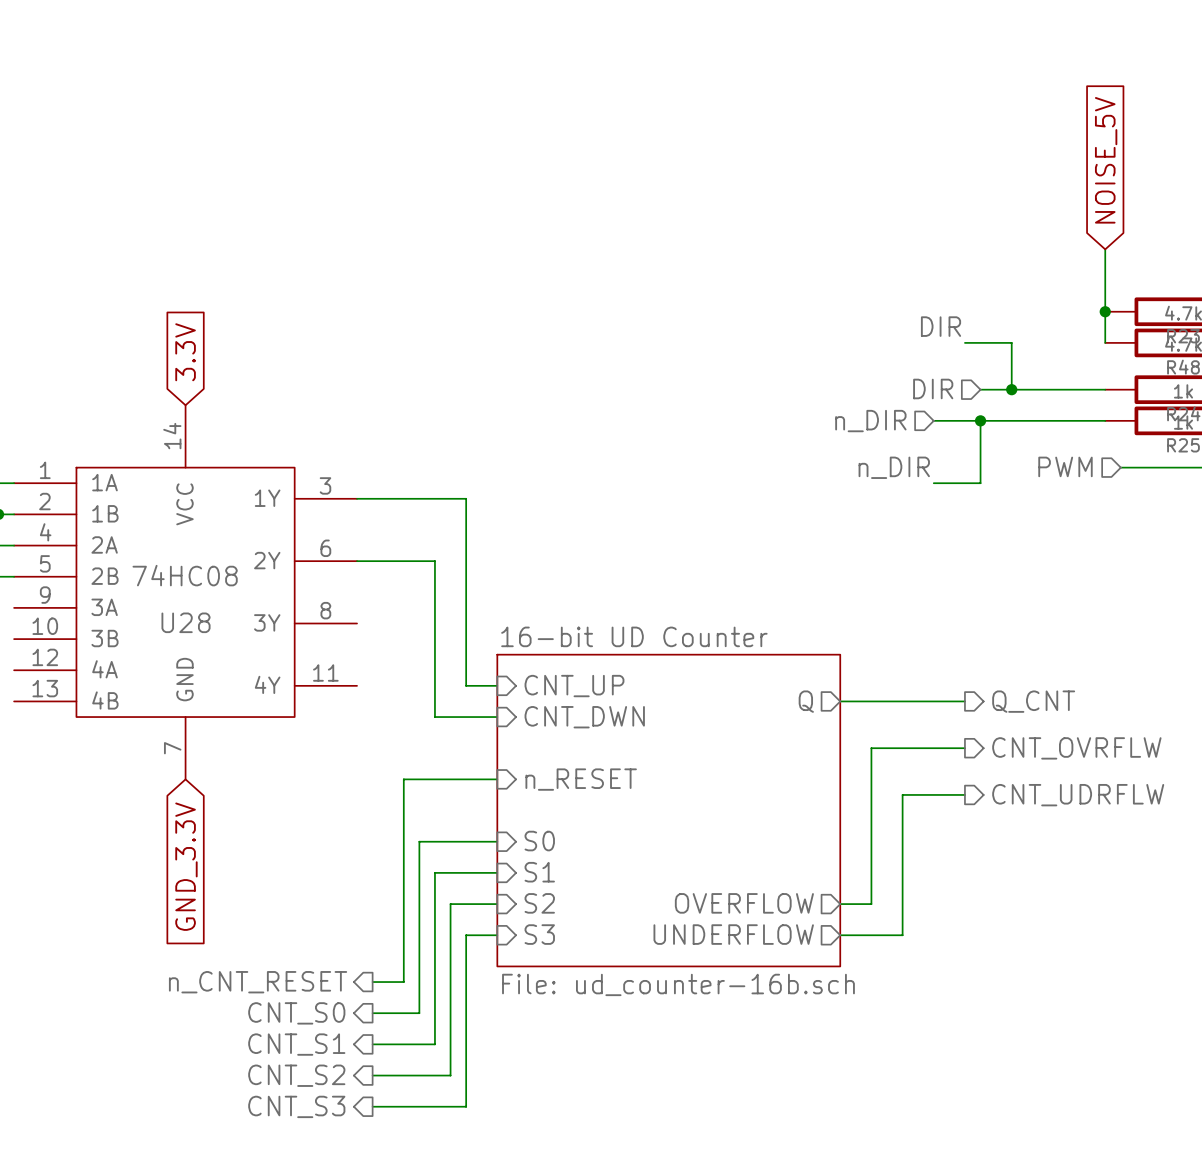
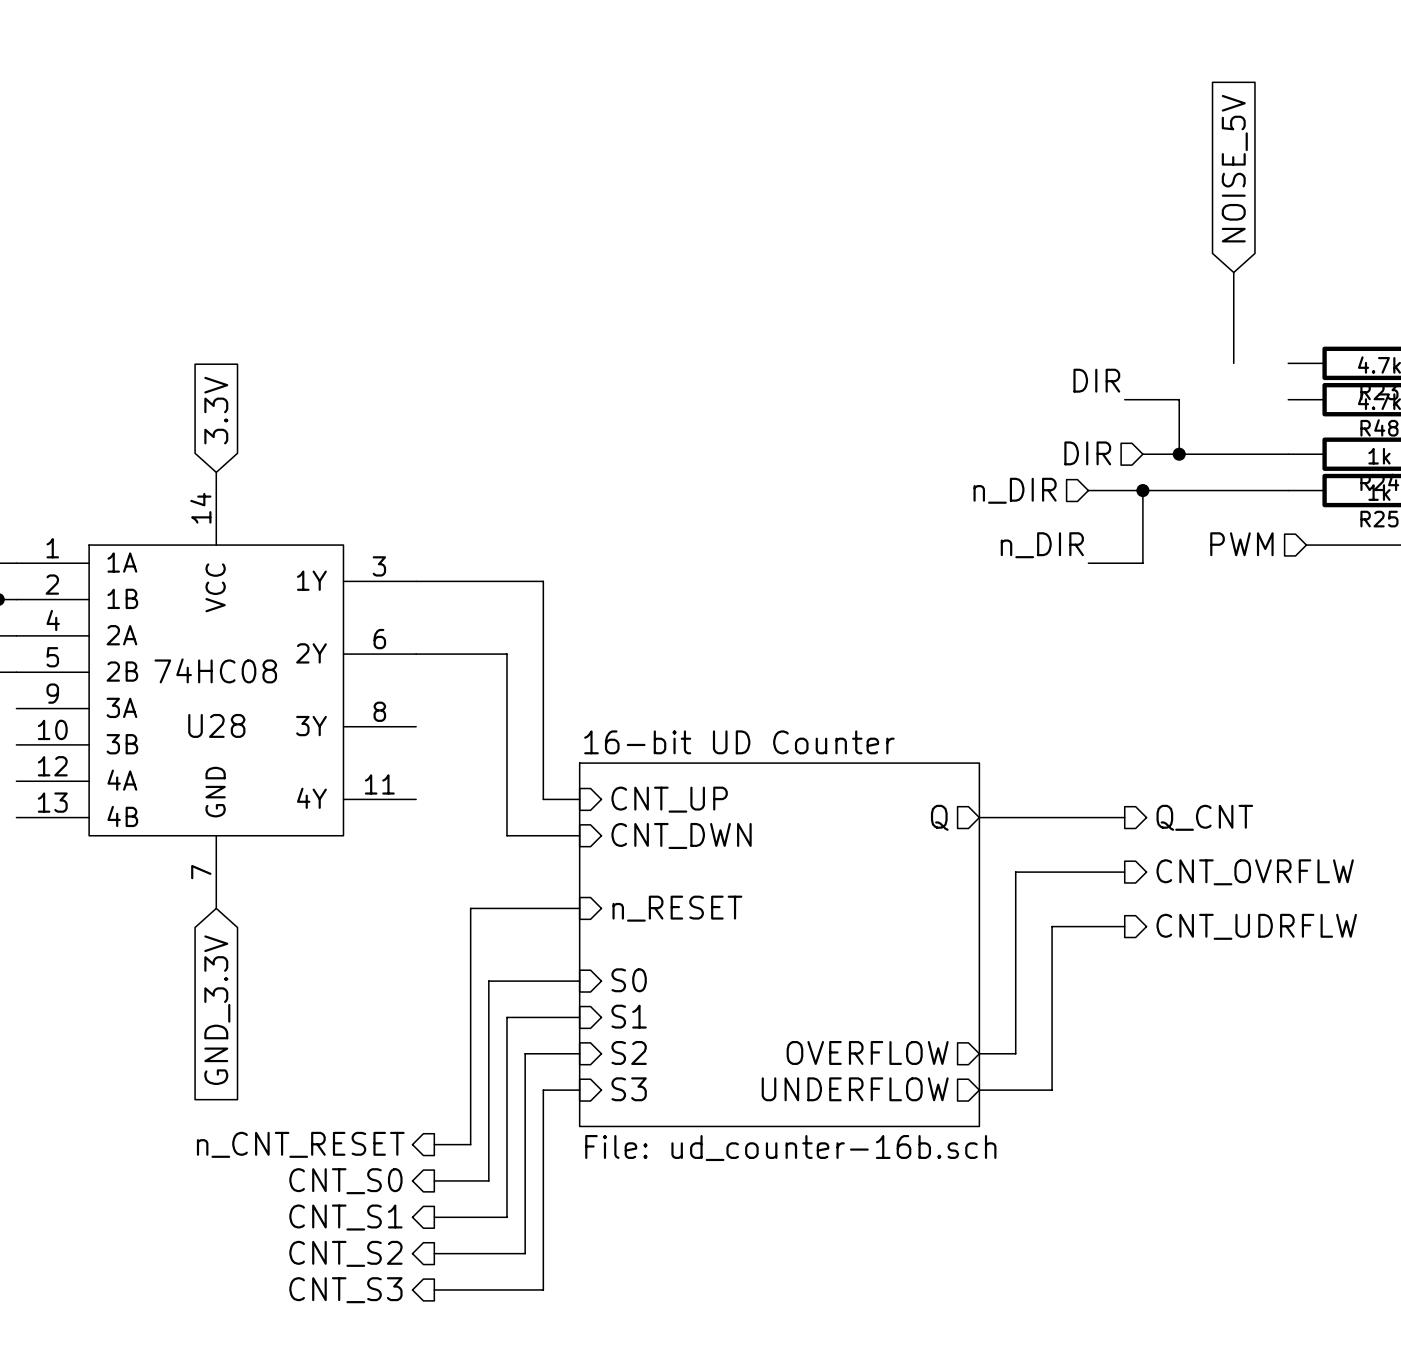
global label position: NOISE_5V (1106, 160) -> NOISE_5V (1234, 168)
wire: none -> (1233, 272) (1233, 363)
wire: (1105, 249) (1105, 342) -> none
junction: (1105, 311) -> none

